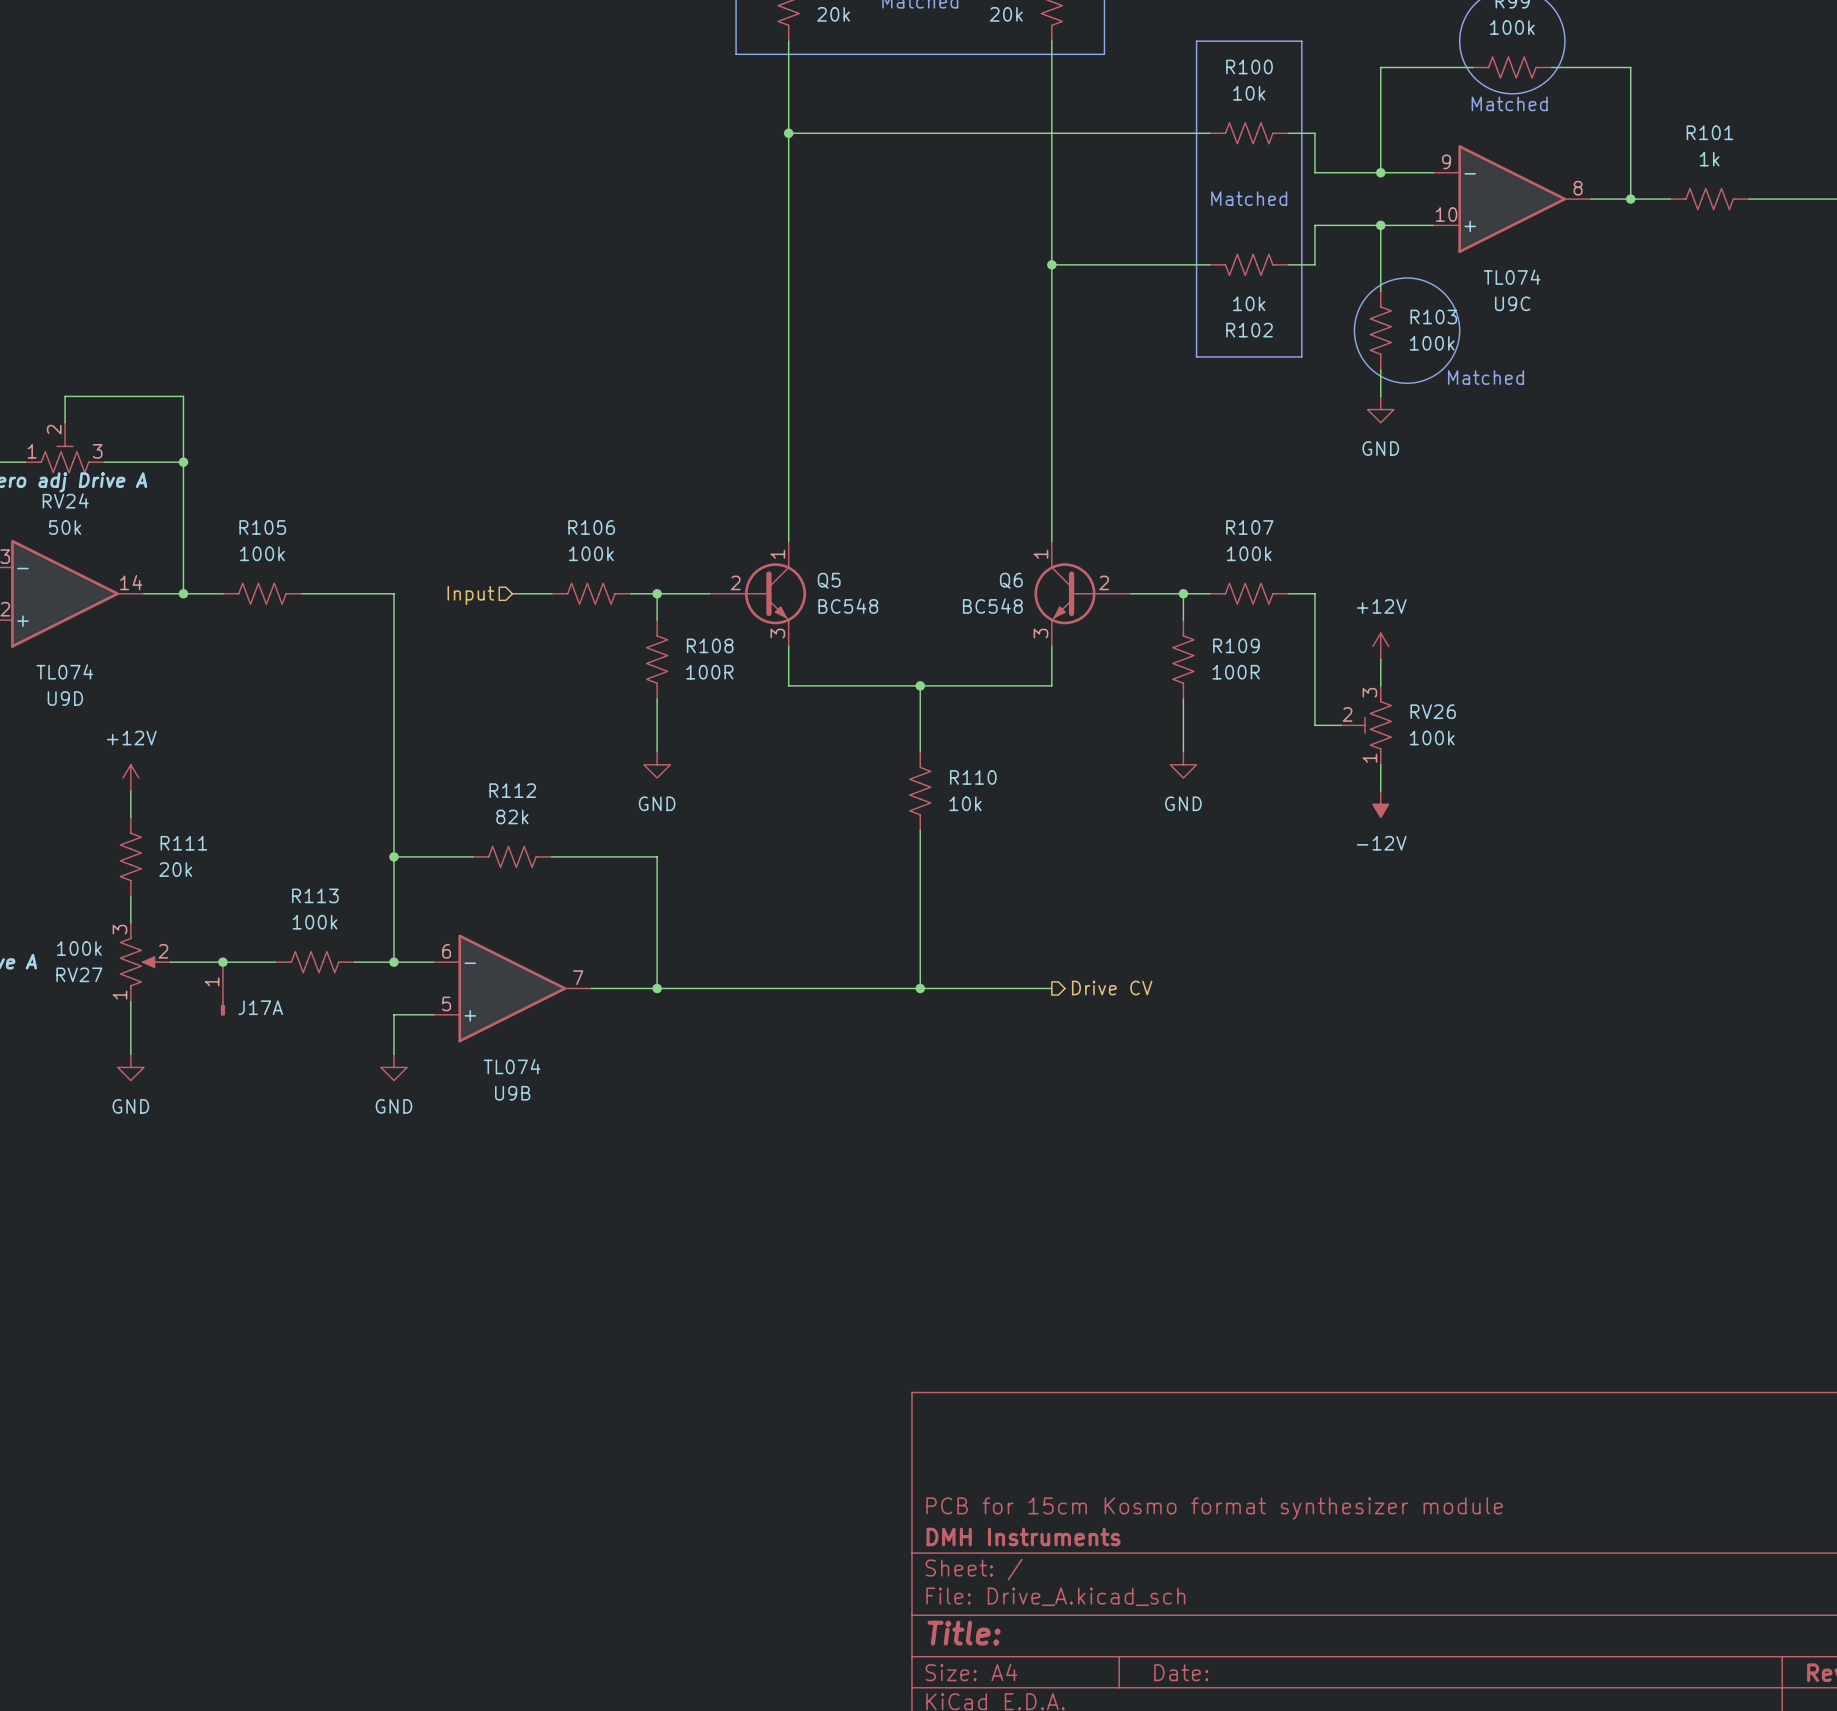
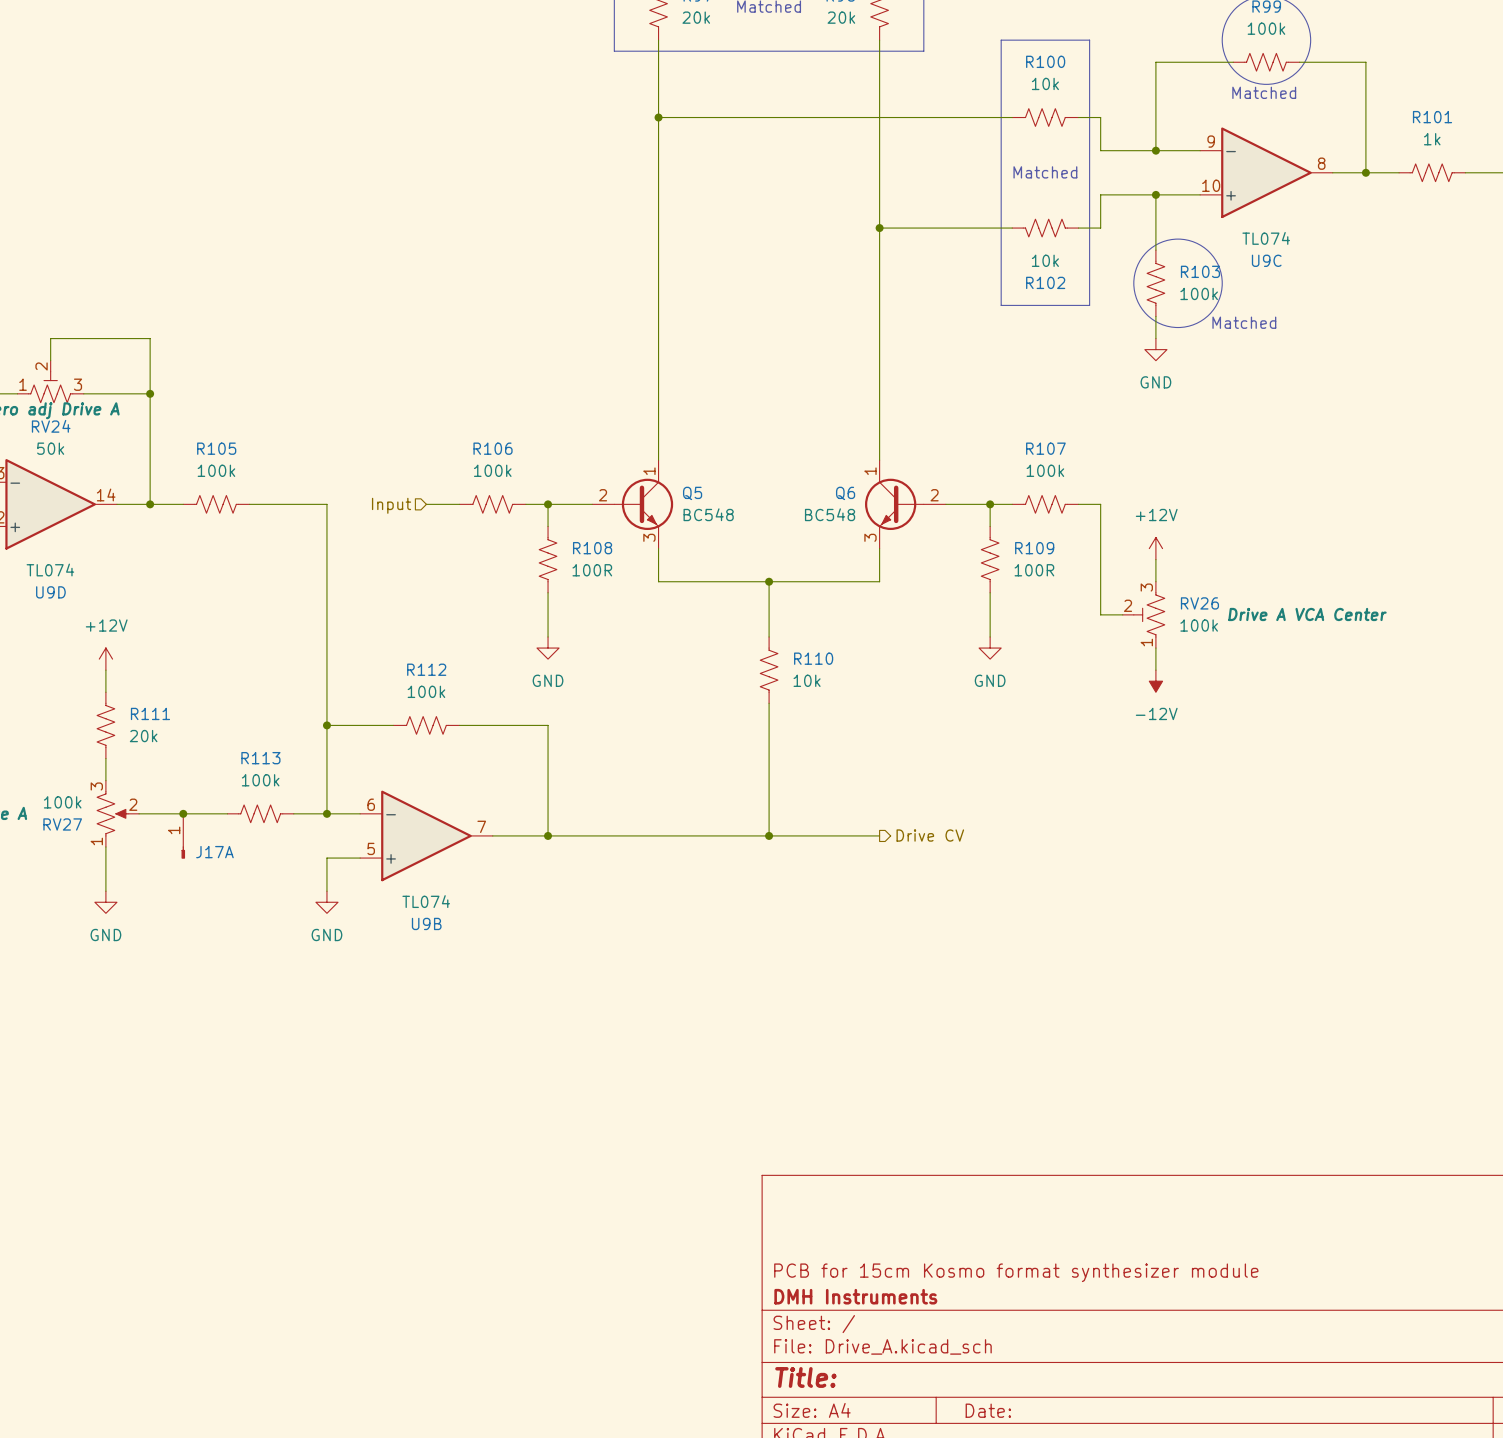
Q5 symbol: [709, 541, 807, 647] -> [592, 460, 674, 549]
Q6 symbol: [1034, 541, 1131, 647] -> [865, 460, 946, 549]
RV26 text: none -> Drive A VCA Center (1307, 614)
R112 value: 82k (512, 816) -> 100k (426, 691)

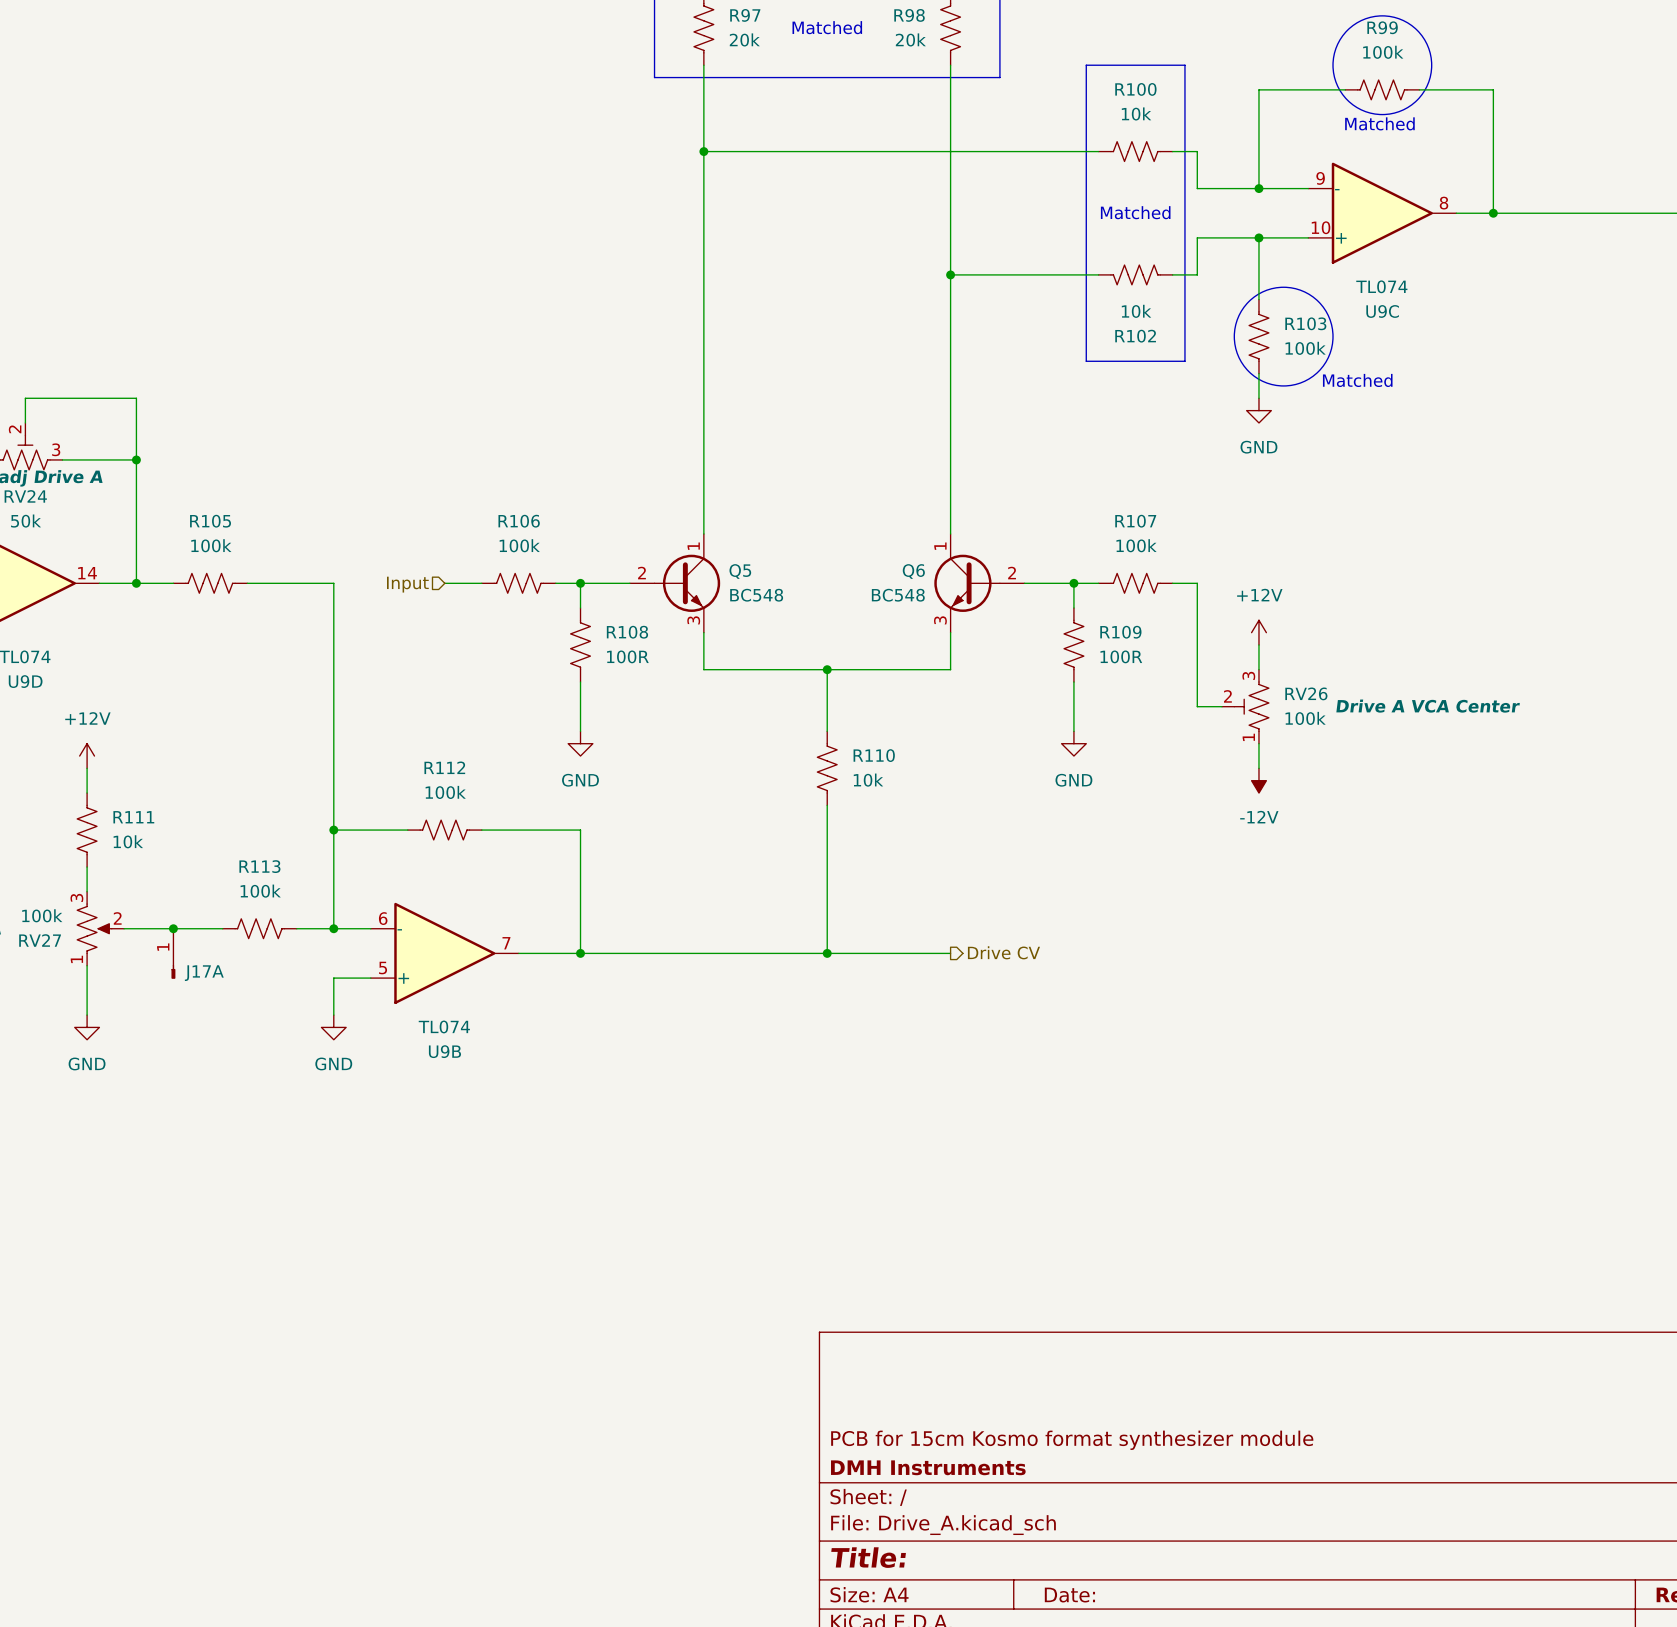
R101: 1k (1432, 172) -> none
R111 value: 20k (143, 736) -> 10k (128, 841)

